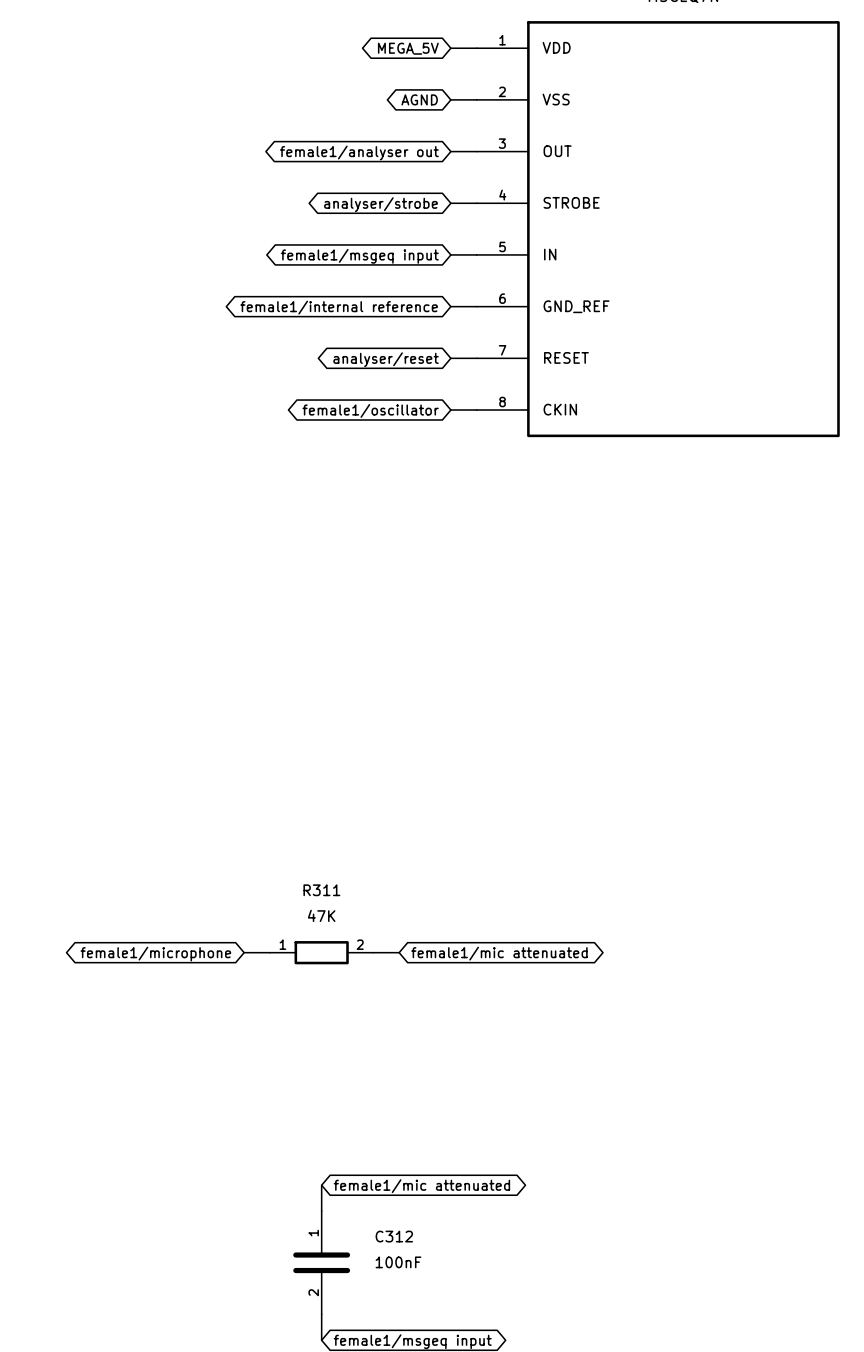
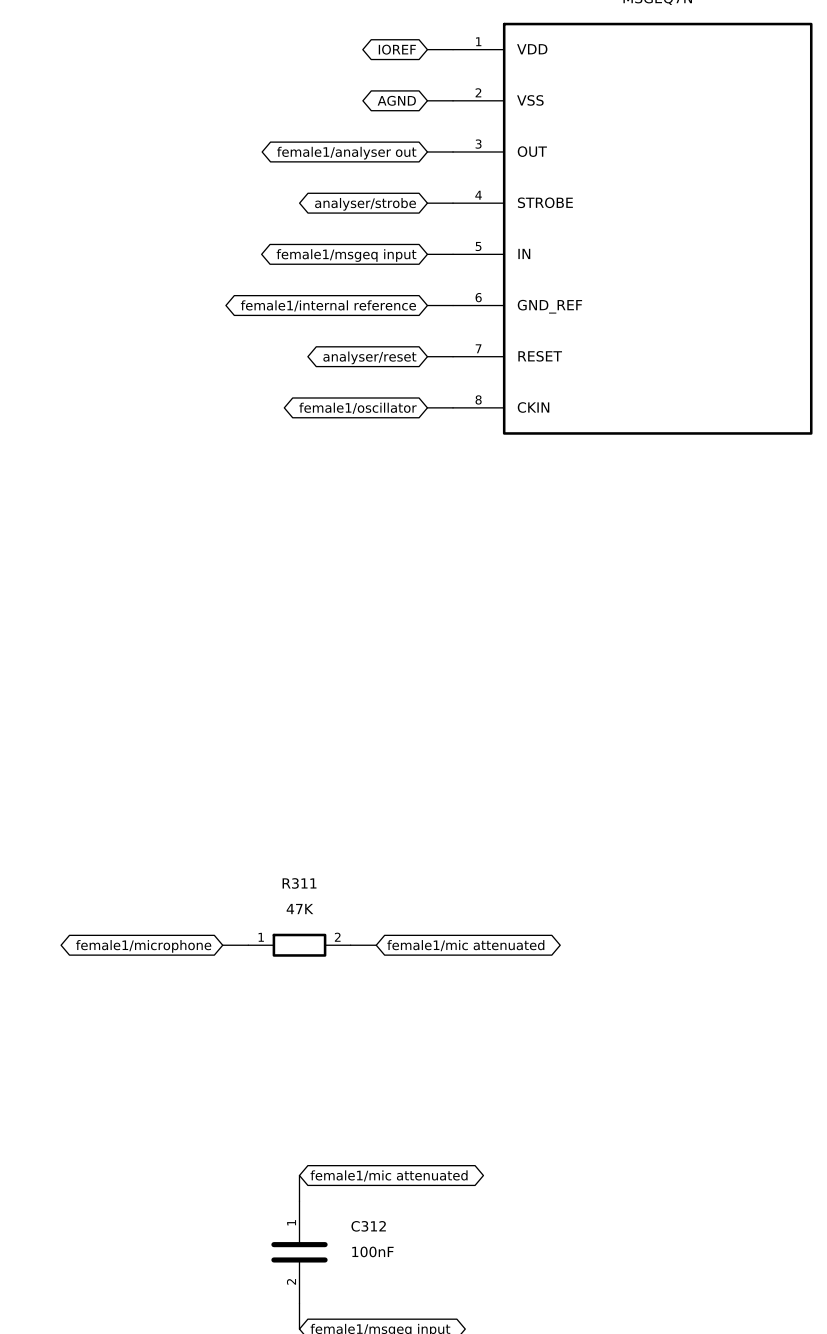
global label: MEGA_5V (408, 48) -> IOREF (397, 49)

